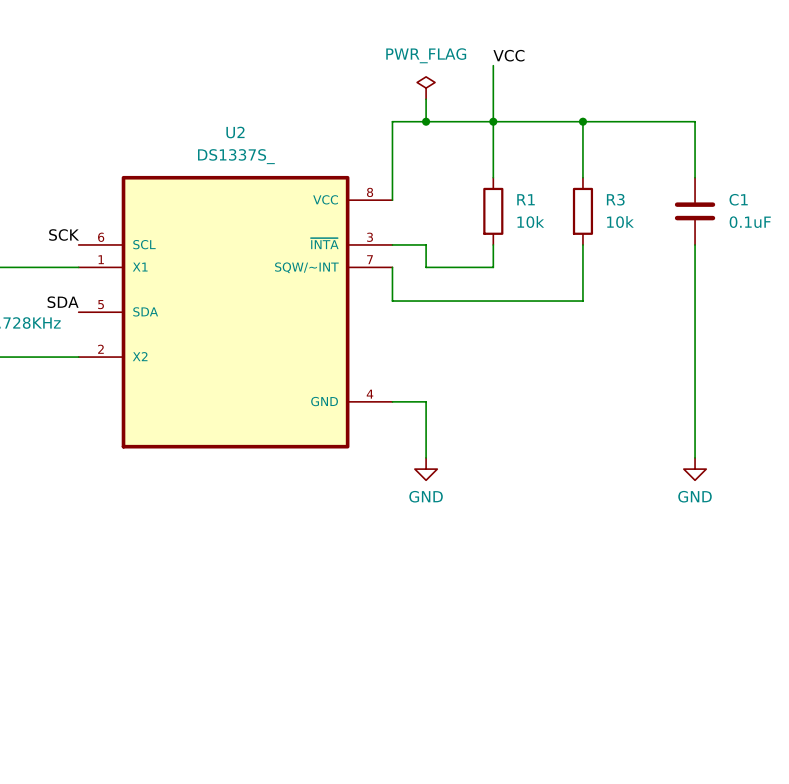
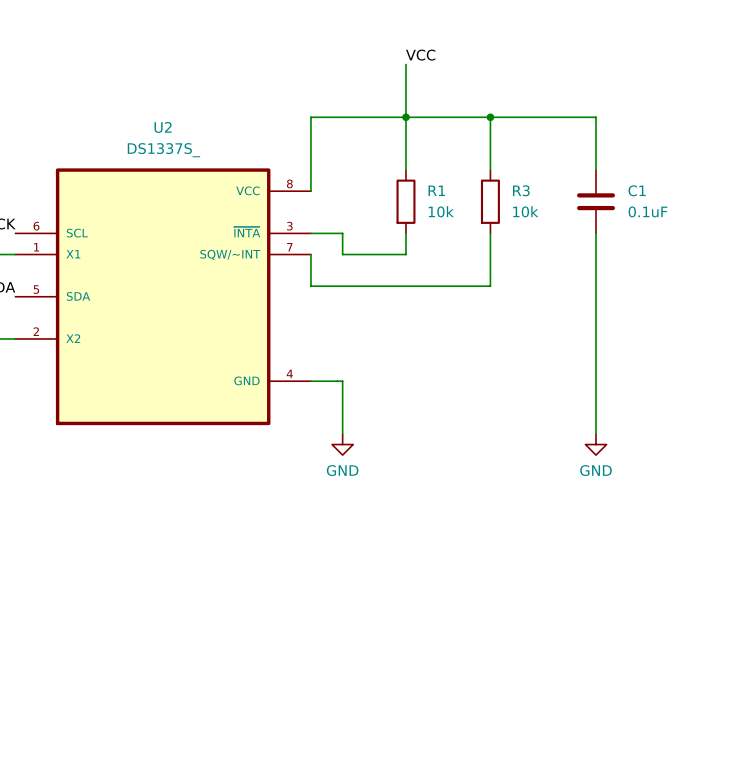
power symbol: PWR_FLAG (426, 88) -> none
wire: (426, 99) (426, 121) -> none
junction: (426, 121) -> none

